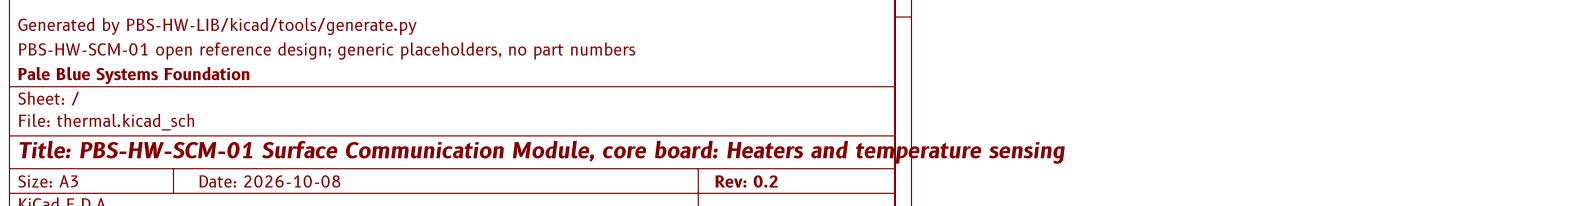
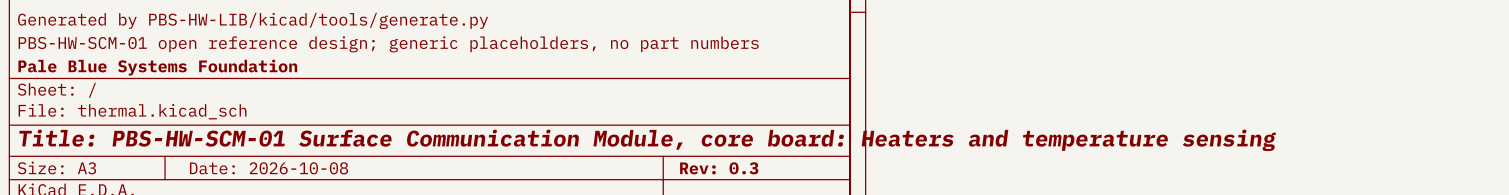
title block: Rev: 0.2 (746, 181) -> Rev: 0.3 (719, 168)

